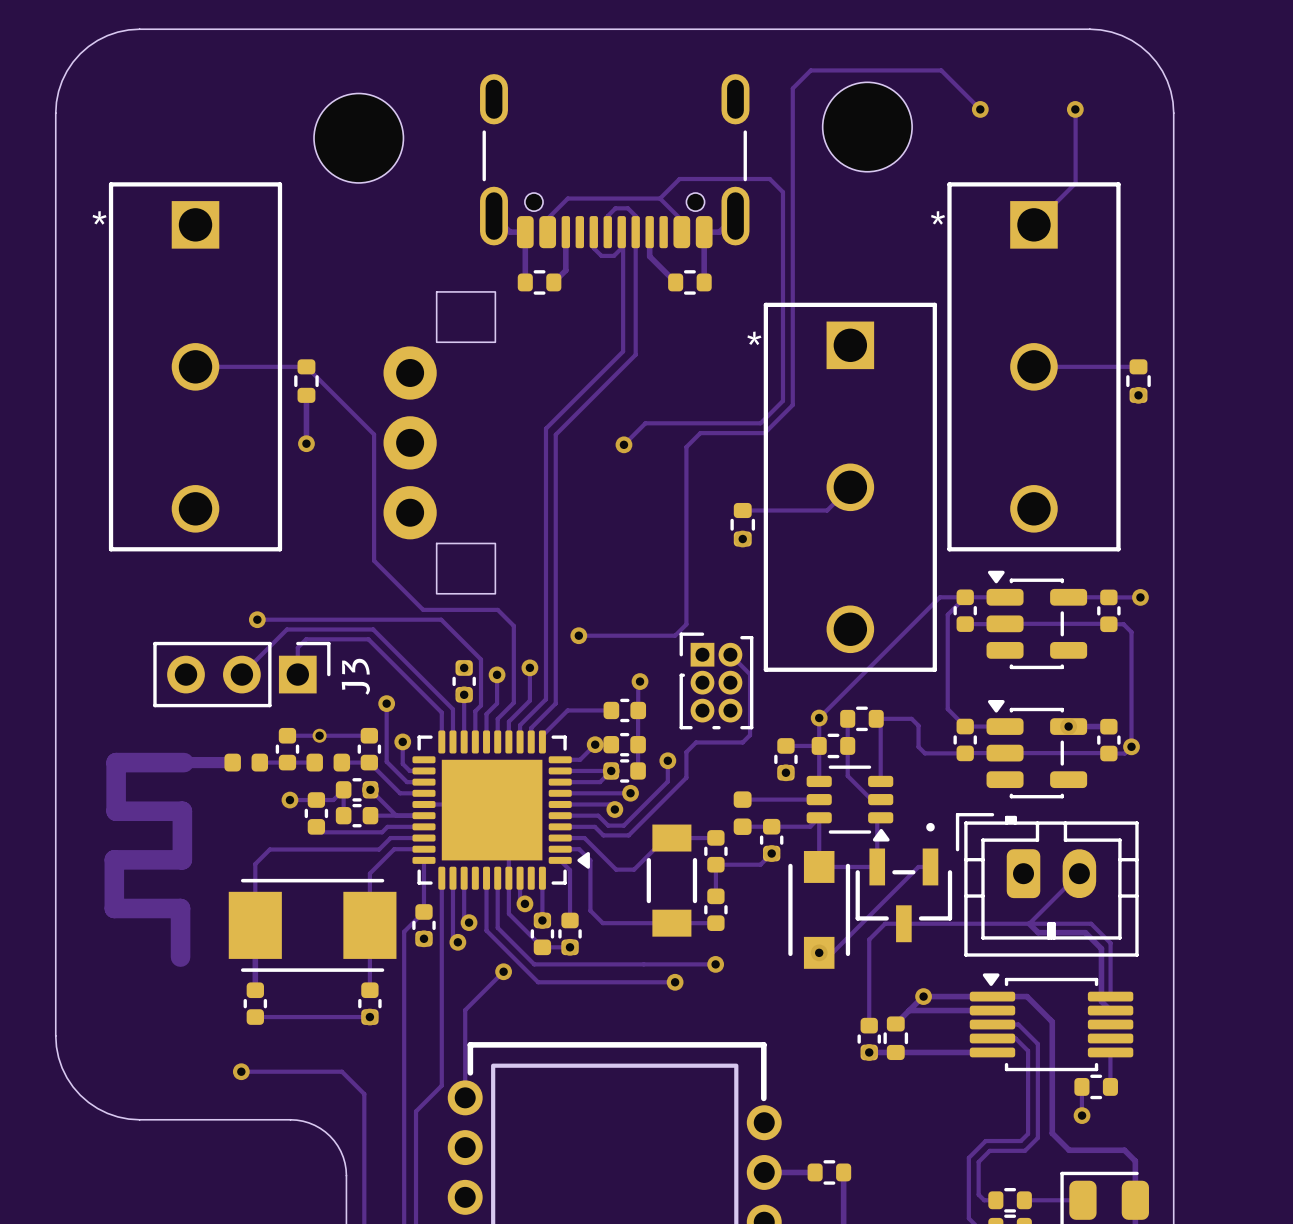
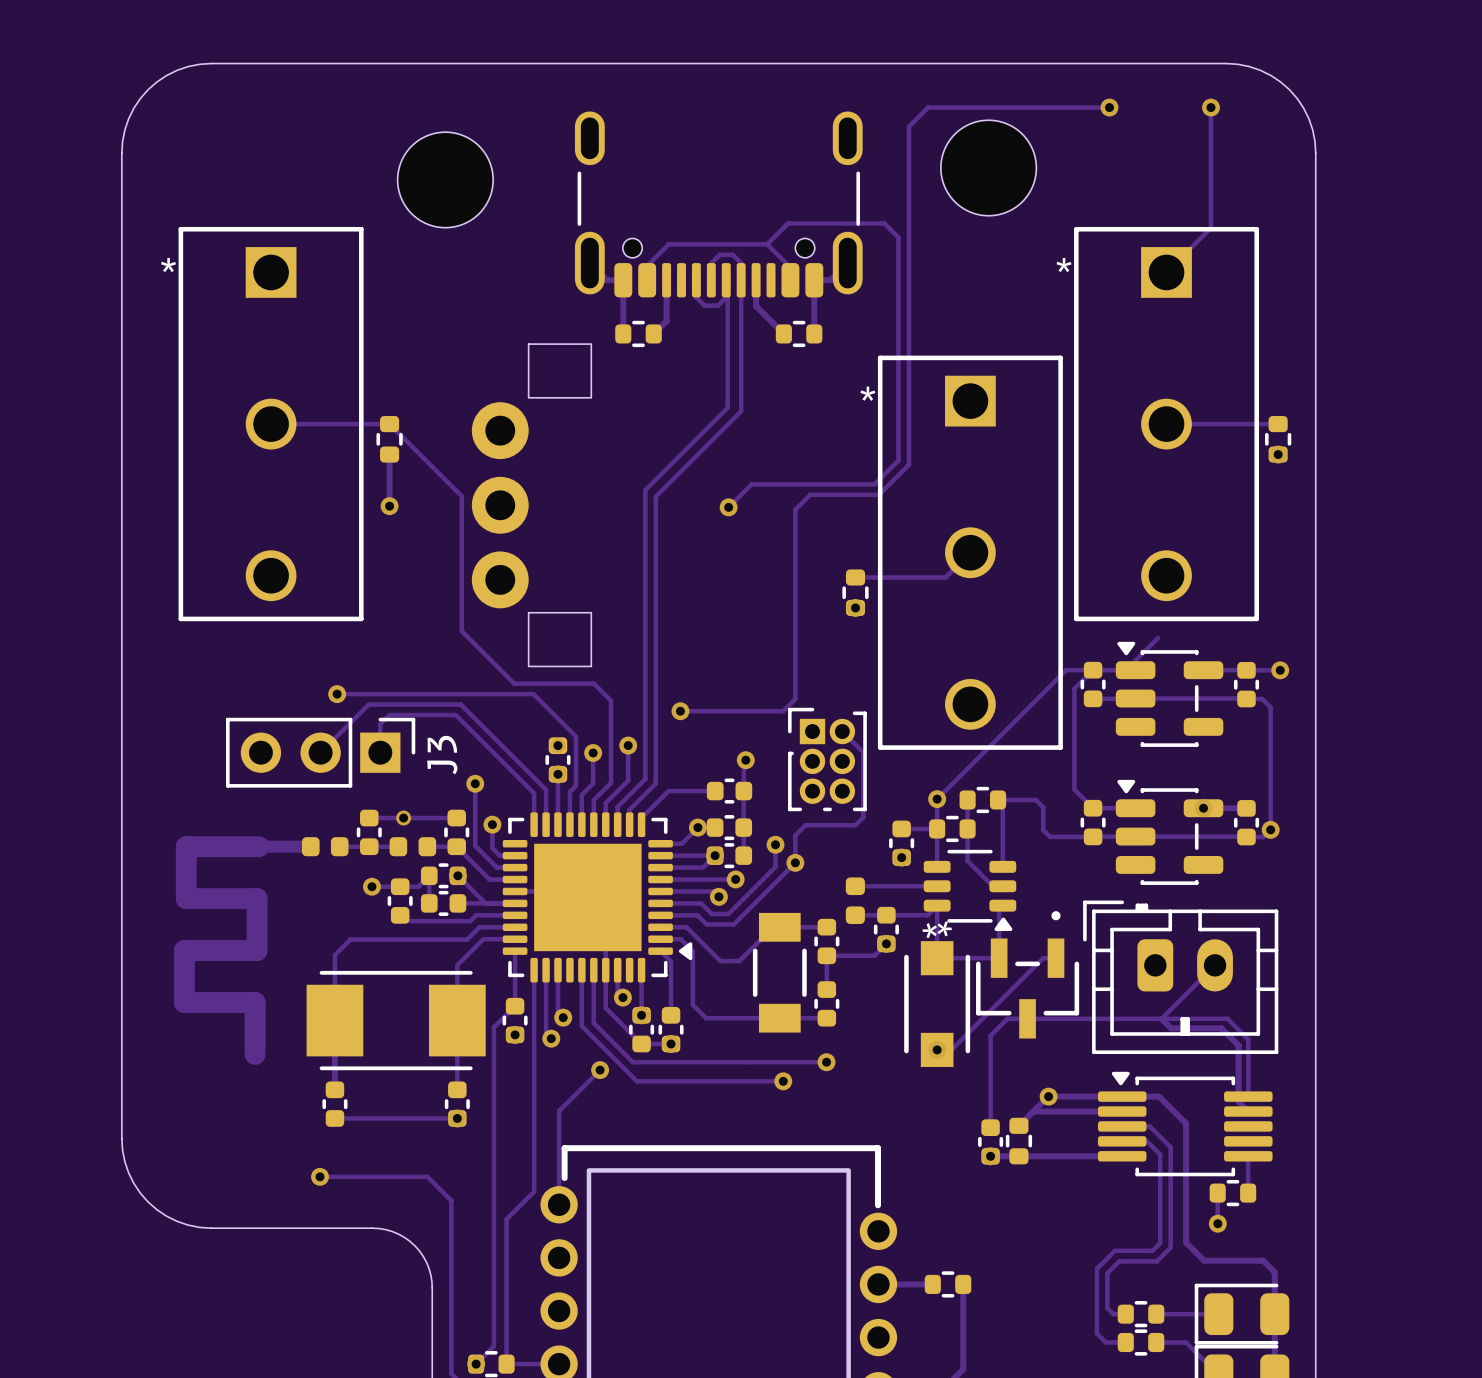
track: (941, 70) (980, 109) -> (1067, 107) (1109, 107)
track: none -> (1210, 107) (1210, 149)
via position: (980, 109) -> (1109, 107)
via position: (1075, 109) -> (1210, 107)
track: none -> (1158, 638) (1135, 660) (1135, 670)
via: none -> (795, 862)
part footprint: [788, 850, 851, 969] -> [904, 941, 971, 1067]

